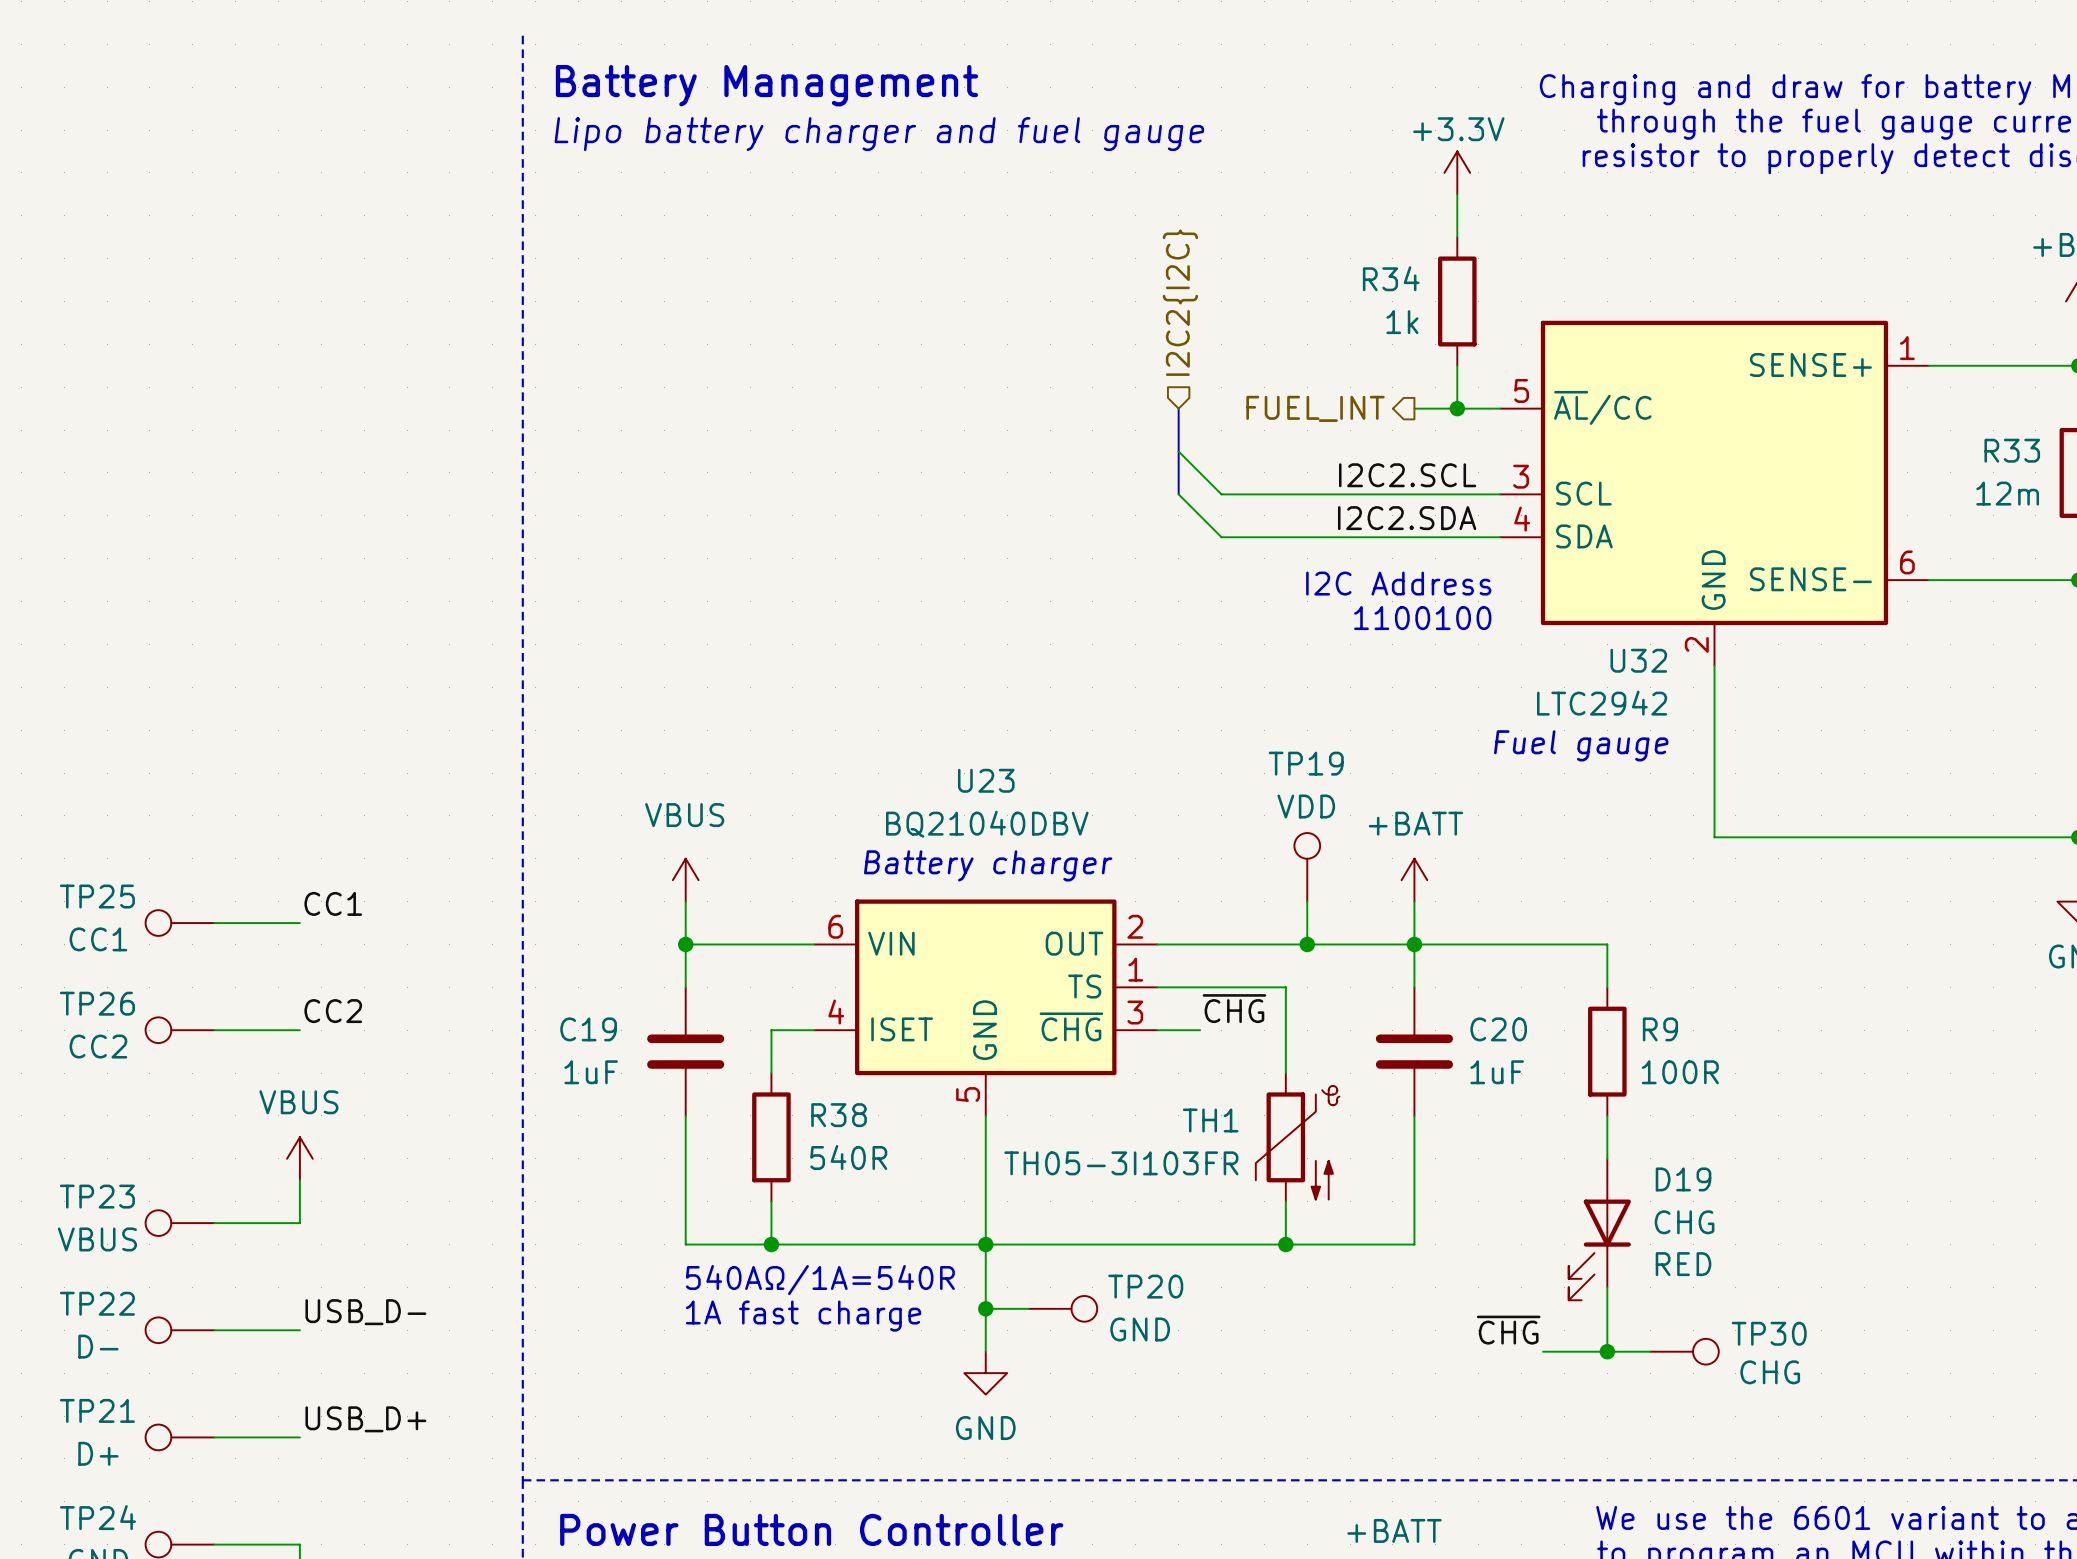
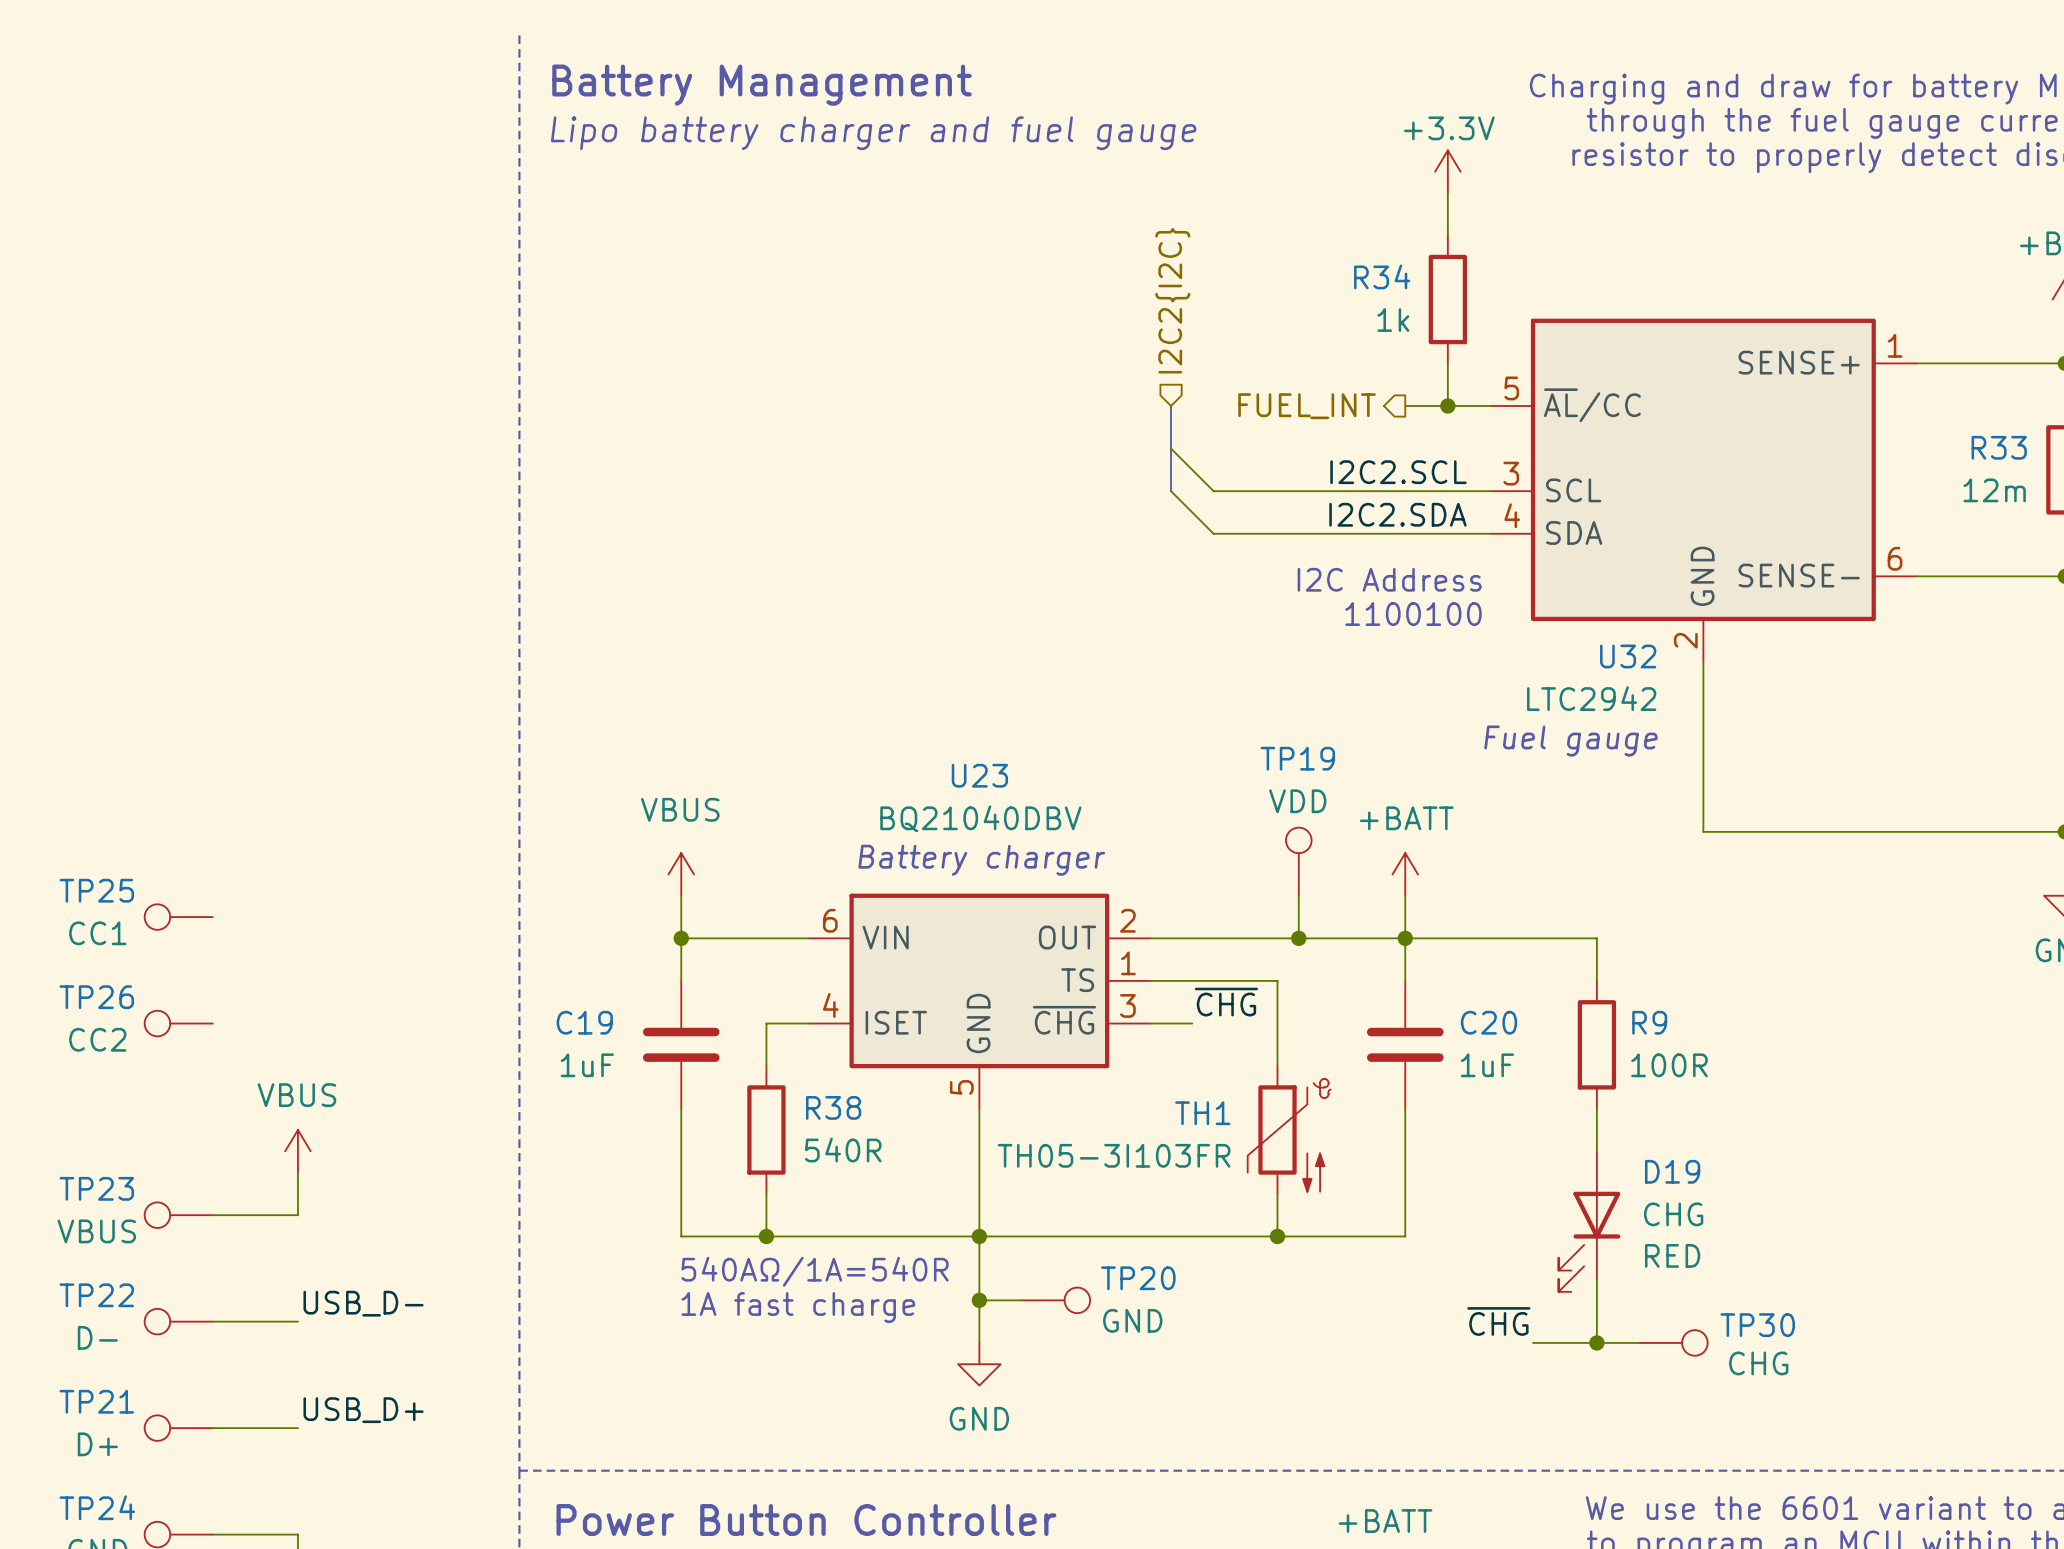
label: CC1 (333, 903) -> none
wire: (214, 923) (299, 923) -> none
label: CC2 (333, 1011) -> none
wire: (214, 1030) (299, 1030) -> none

